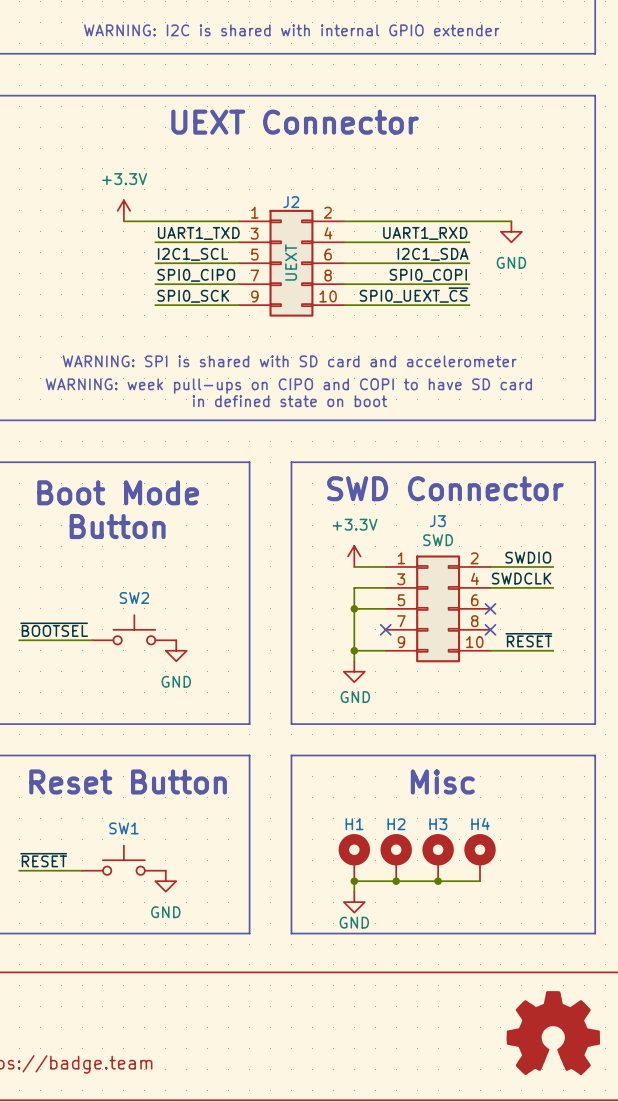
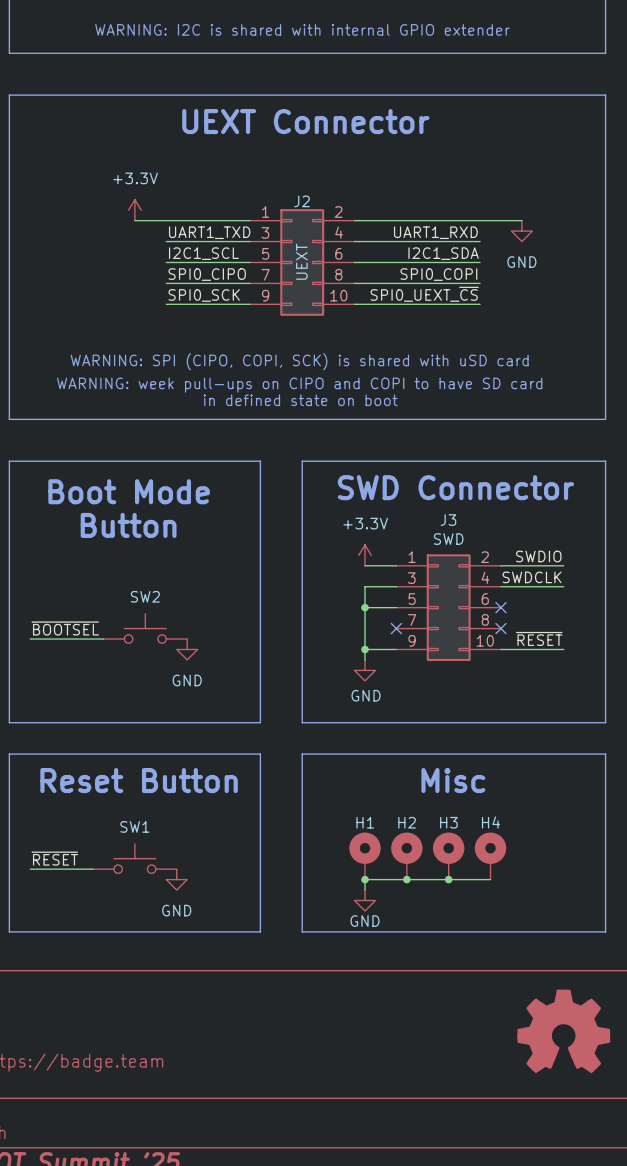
text: WARNING: SPI is shared with SD card and accelerometer (289, 361) -> WARNING: SPI (CIPO, COPI, SCK) is shared with uSD card (299, 361)

